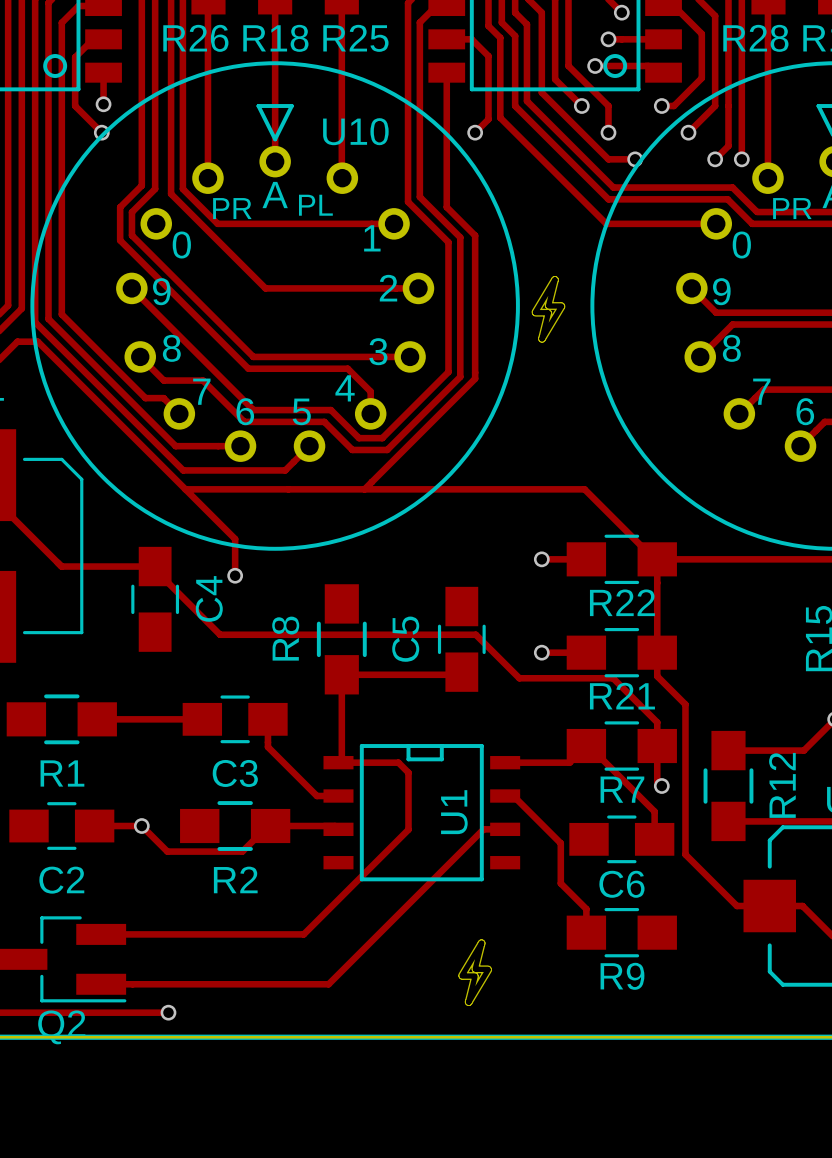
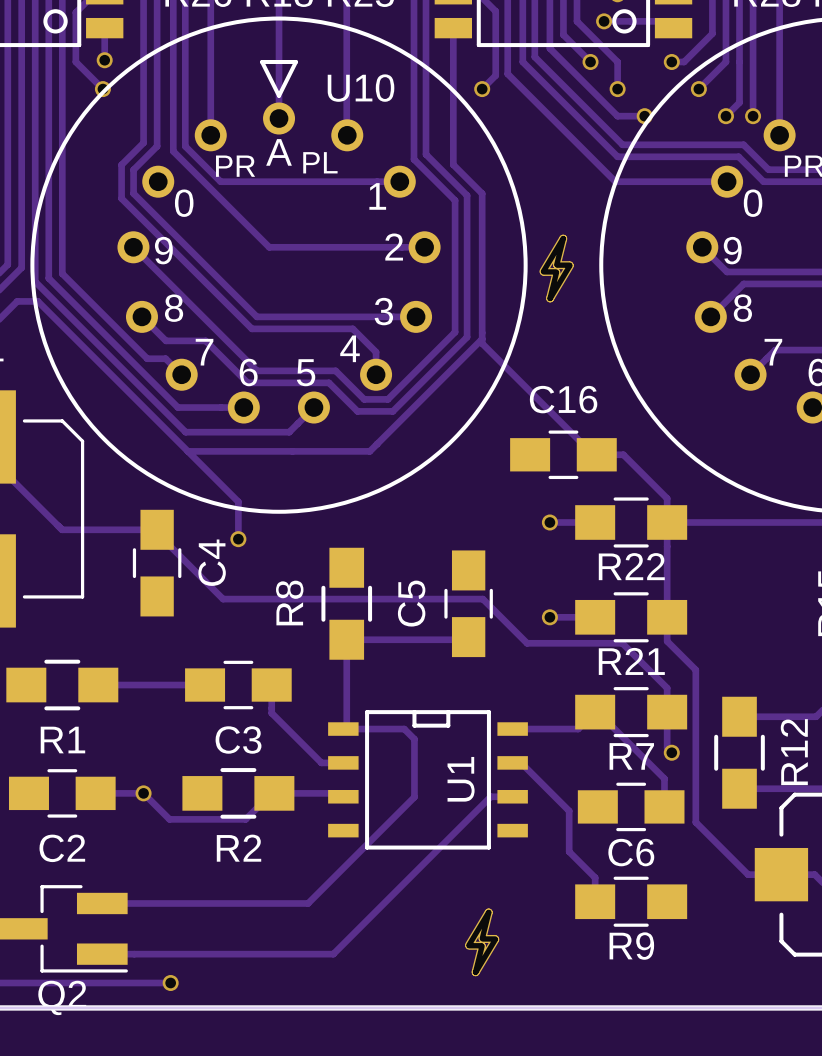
track: none -> (482, 339) (482, 343) (593, 454) (623, 454) (667, 498) (667, 517)
track: (364, 489) (584, 489) (654, 559) -> none
C16: none -> (563, 454)

